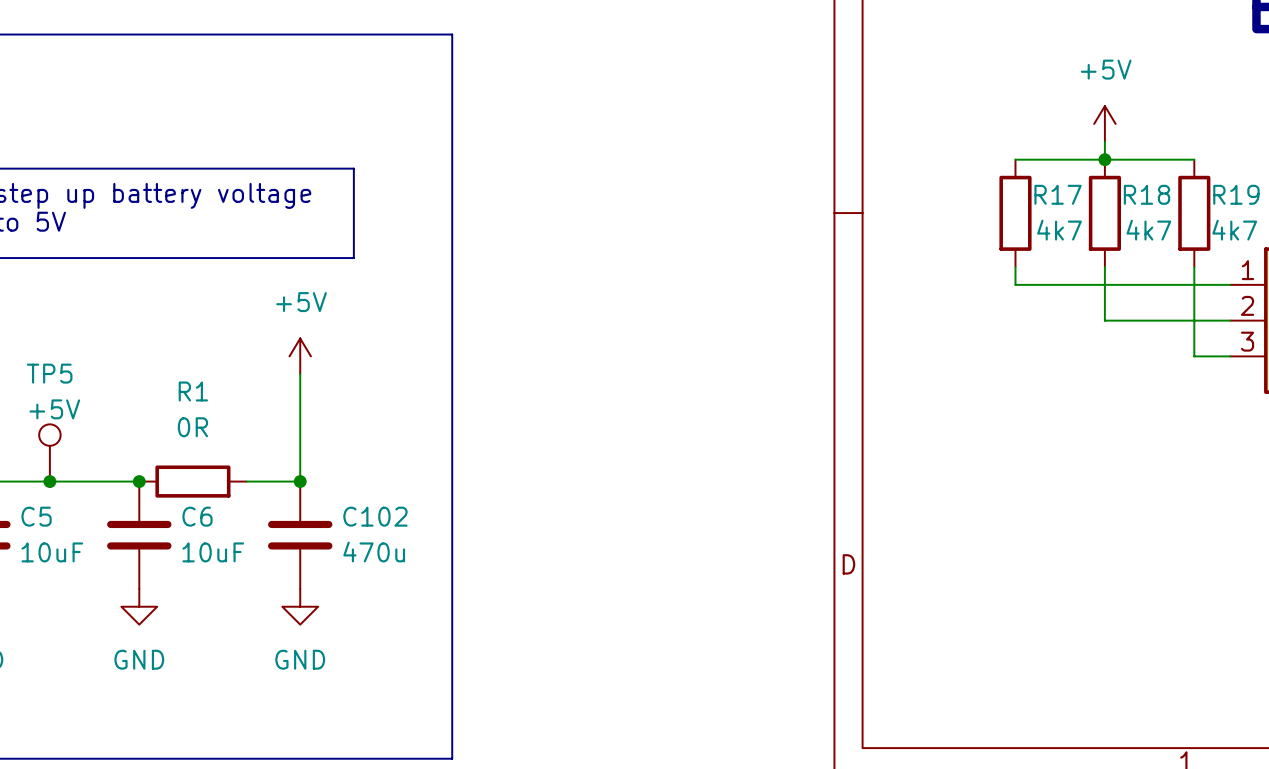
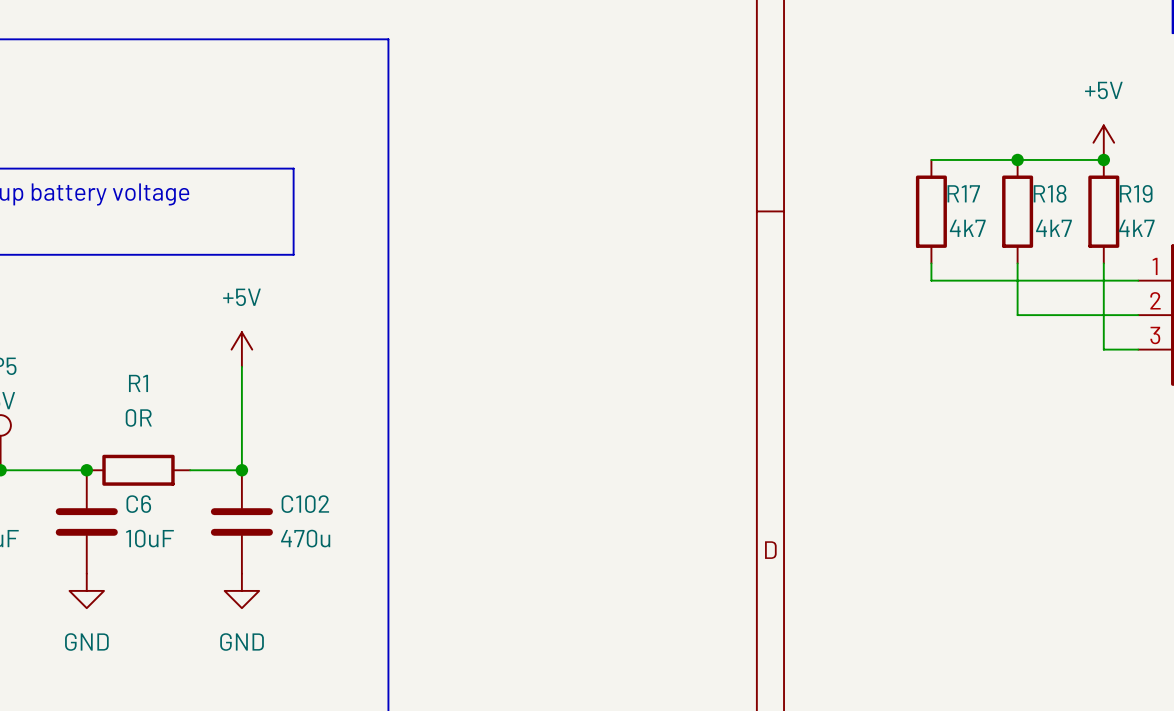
power symbol position: +5V (1104, 123) -> +5V (1103, 142)
wire: (1104, 141) (1104, 159) -> none
junction: none -> (1103, 159)

